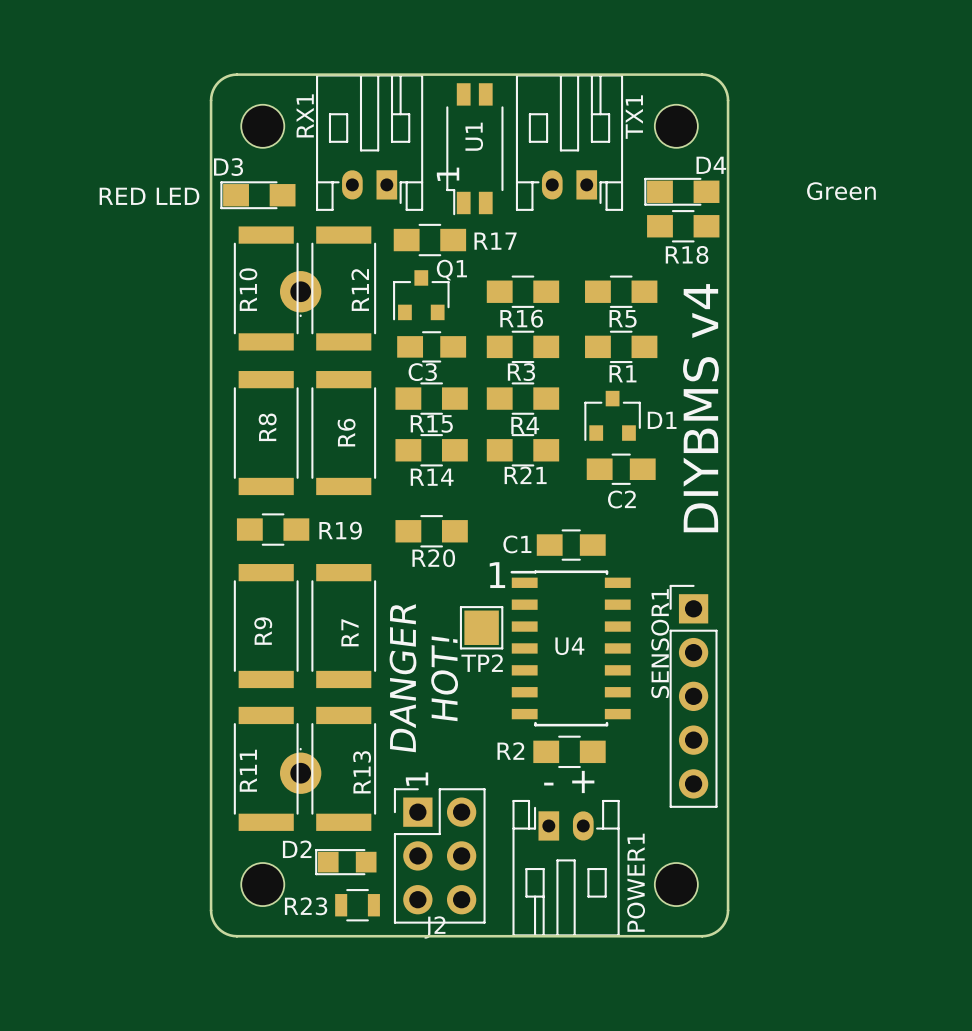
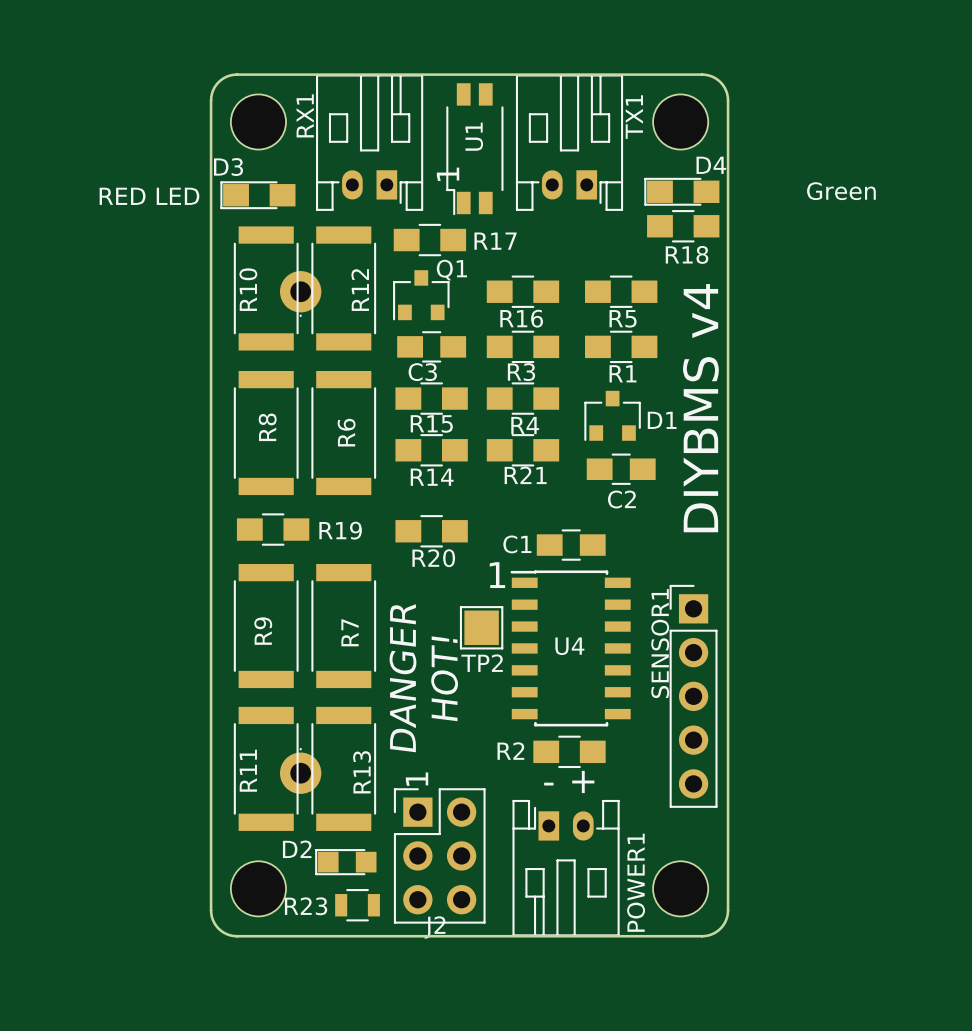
part footprint: [241, 104, 285, 148] -> [230, 94, 287, 150]
part footprint: [654, 104, 698, 148] -> [653, 94, 709, 150]
part footprint: [241, 863, 285, 907] -> [230, 861, 287, 917]
part footprint: [654, 863, 698, 907] -> [653, 861, 709, 917]

